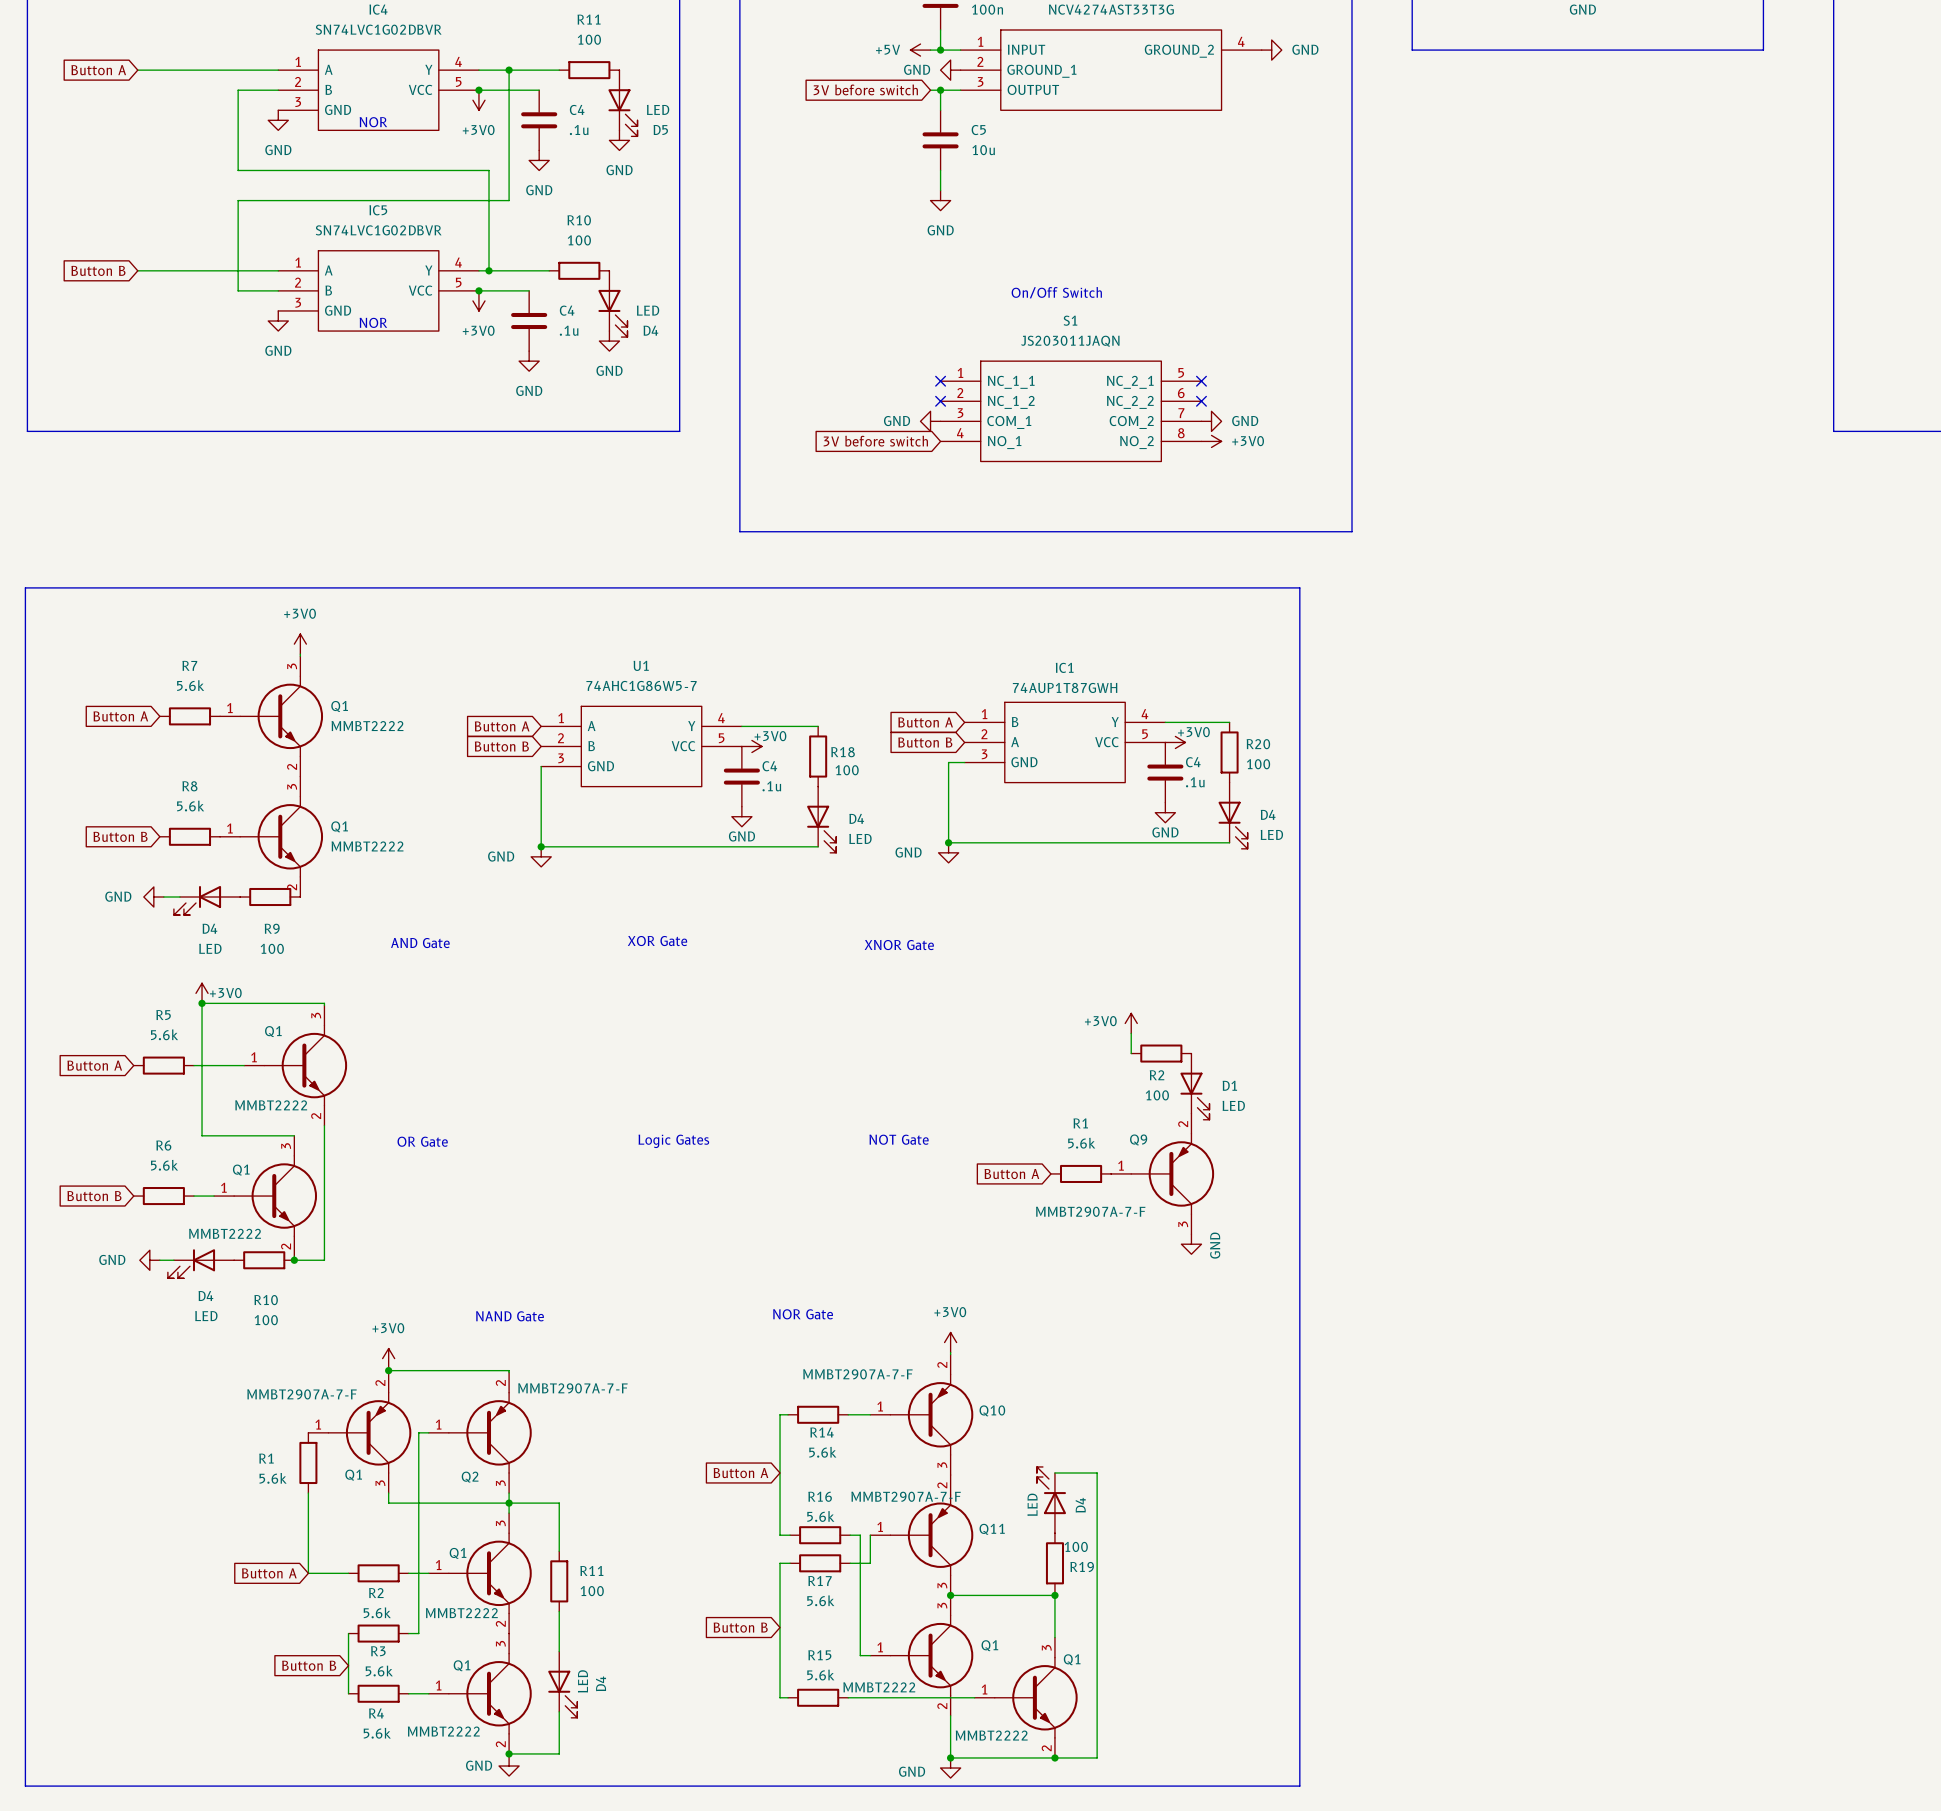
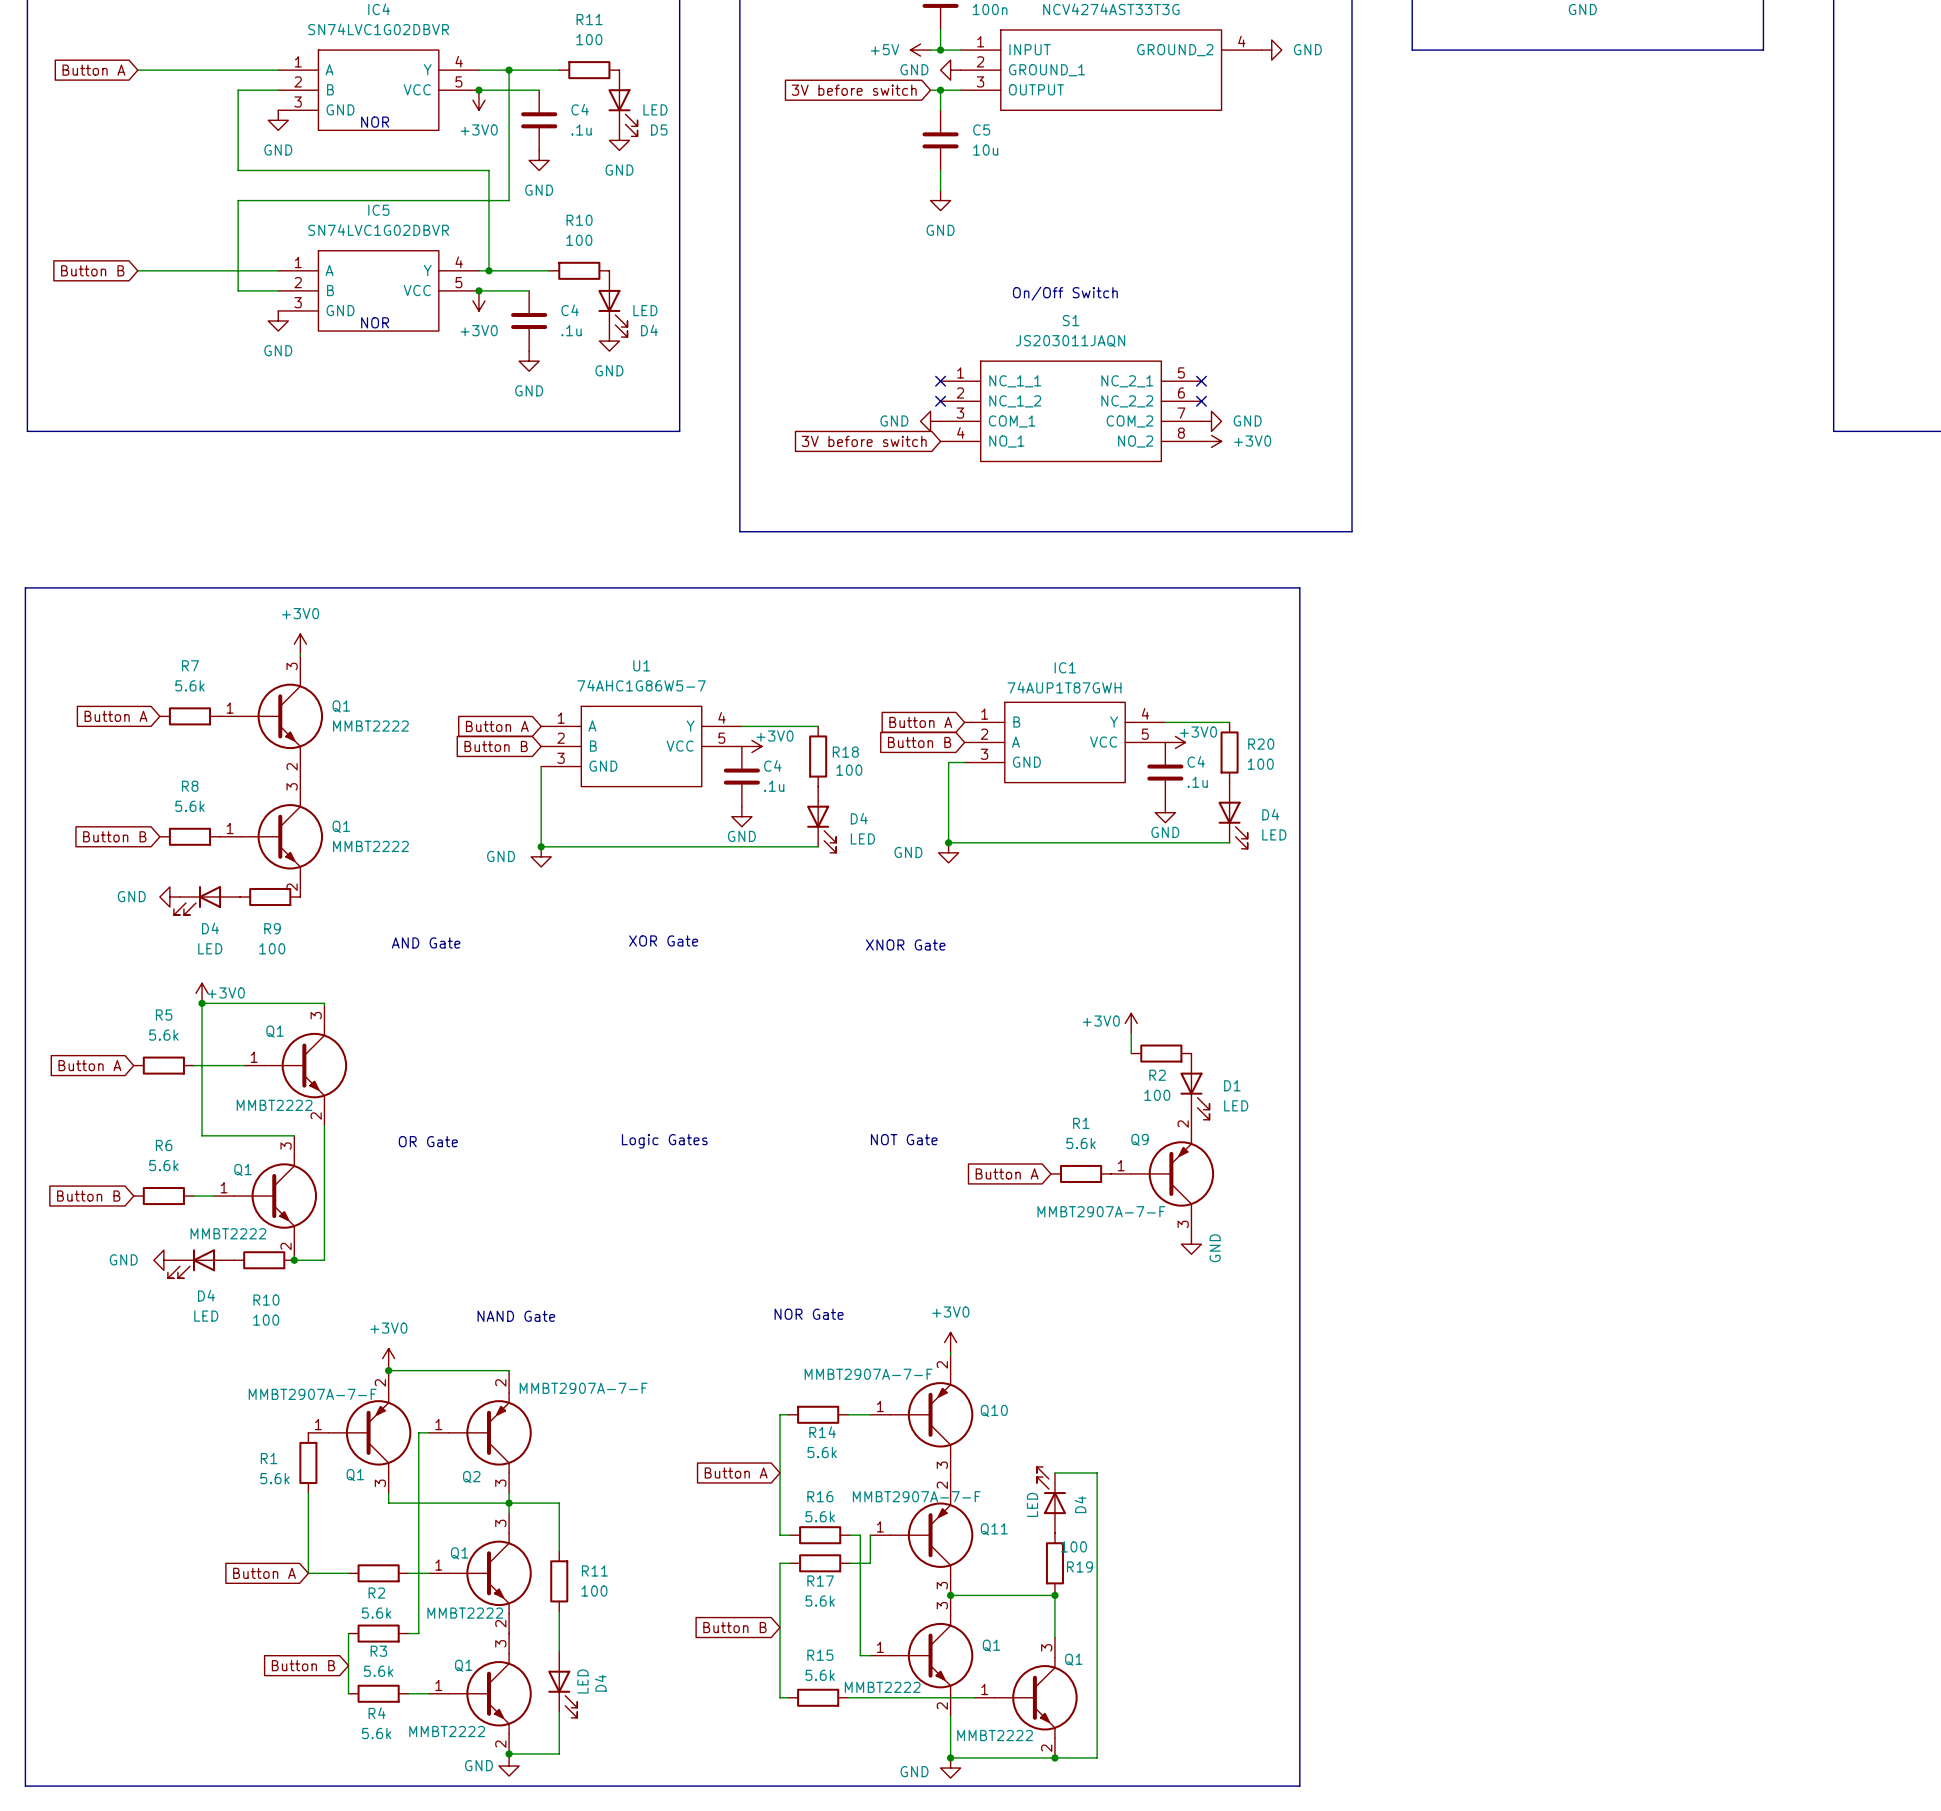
power symbol position: GND (153, 897) -> GND (169, 897)
power symbol position: GND (149, 1260) -> GND (163, 1260)

